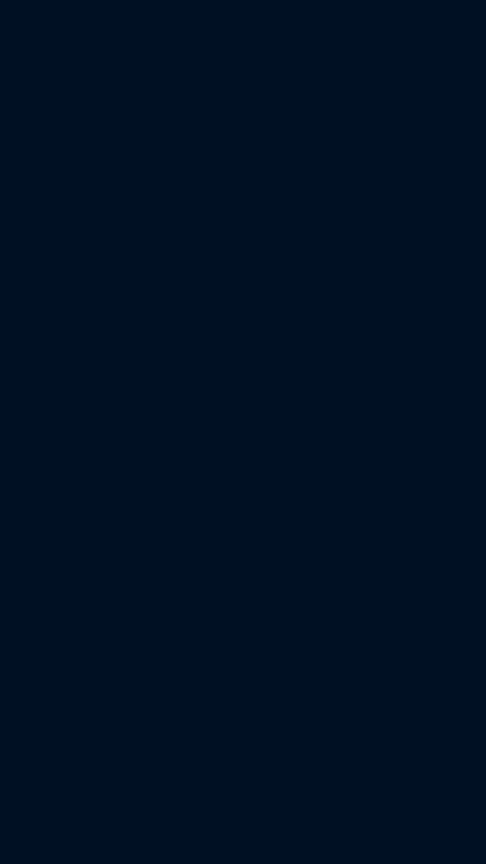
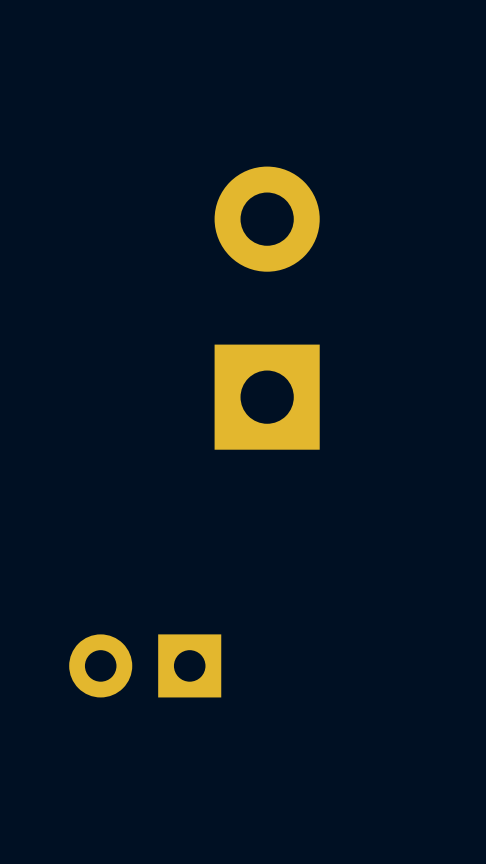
part: none -> (267, 308)
part: none -> (145, 665)

